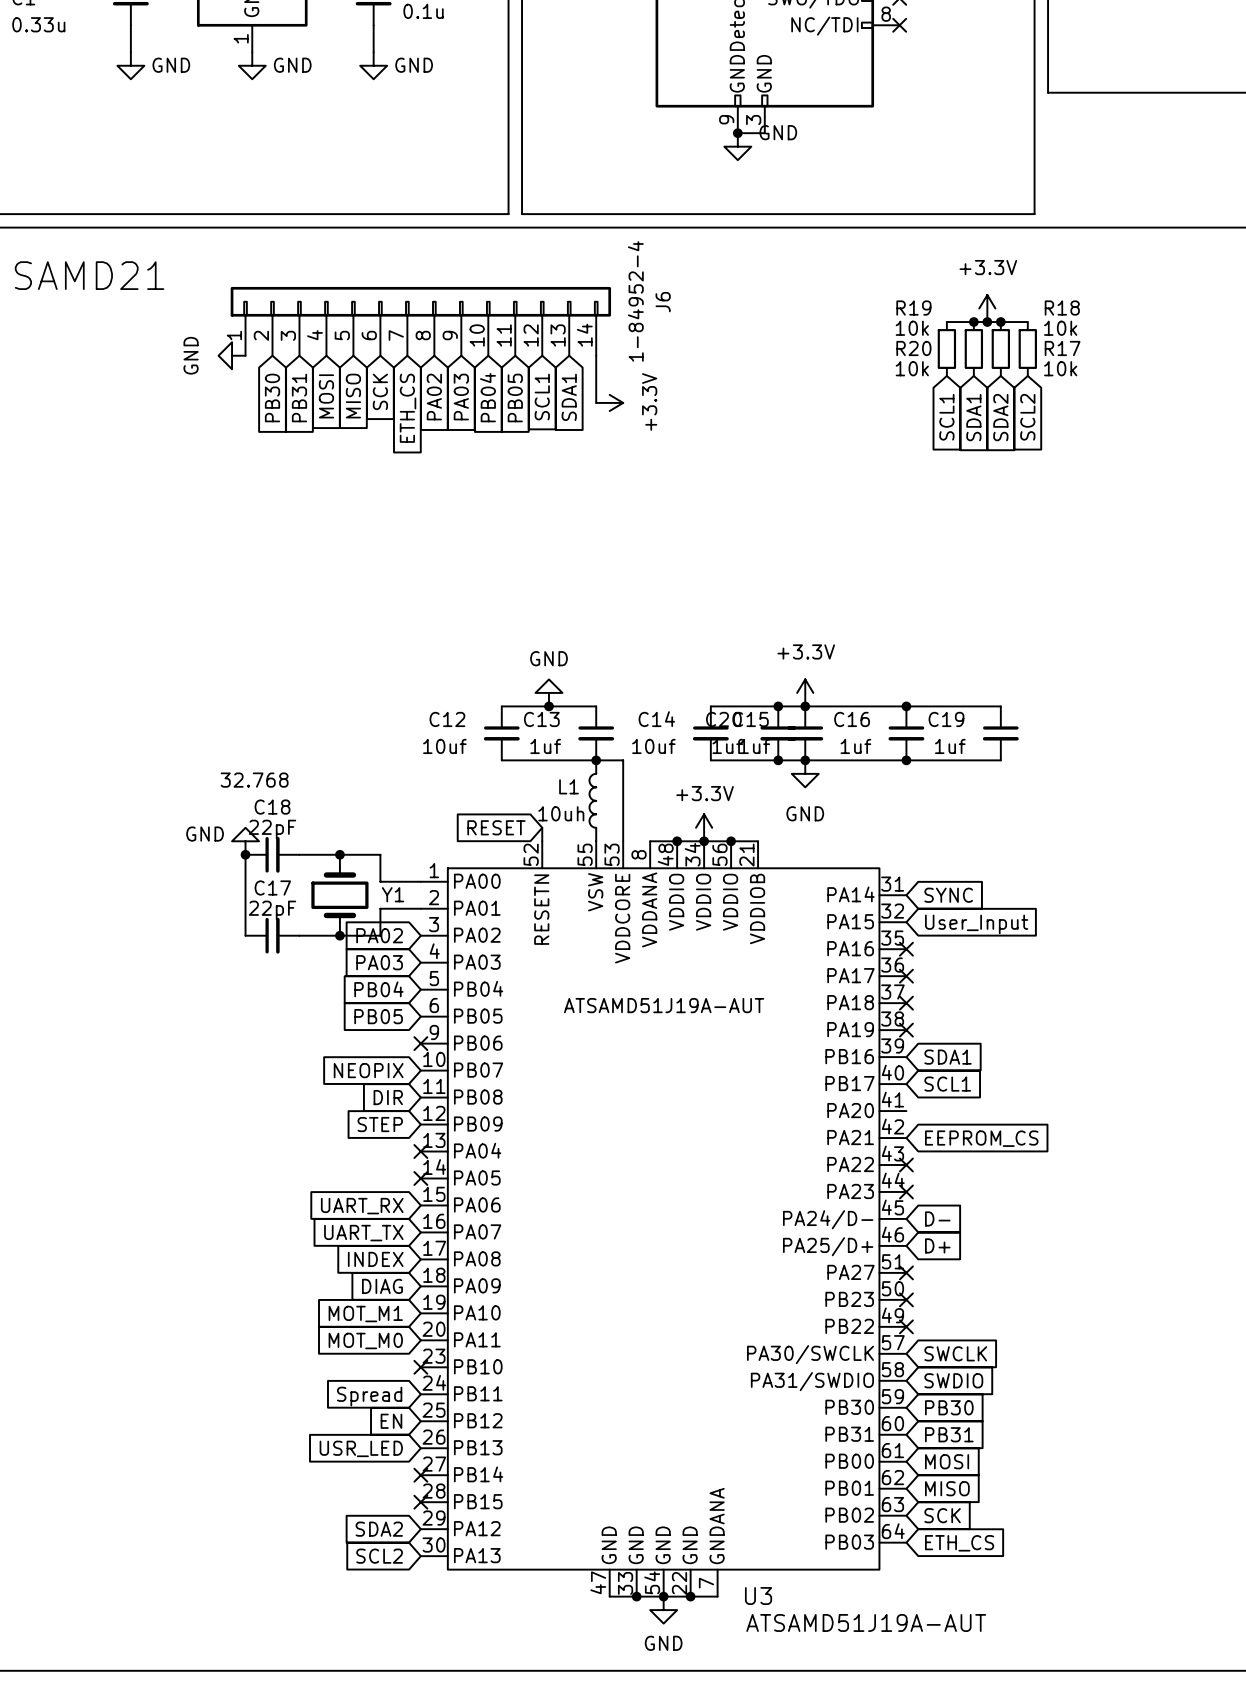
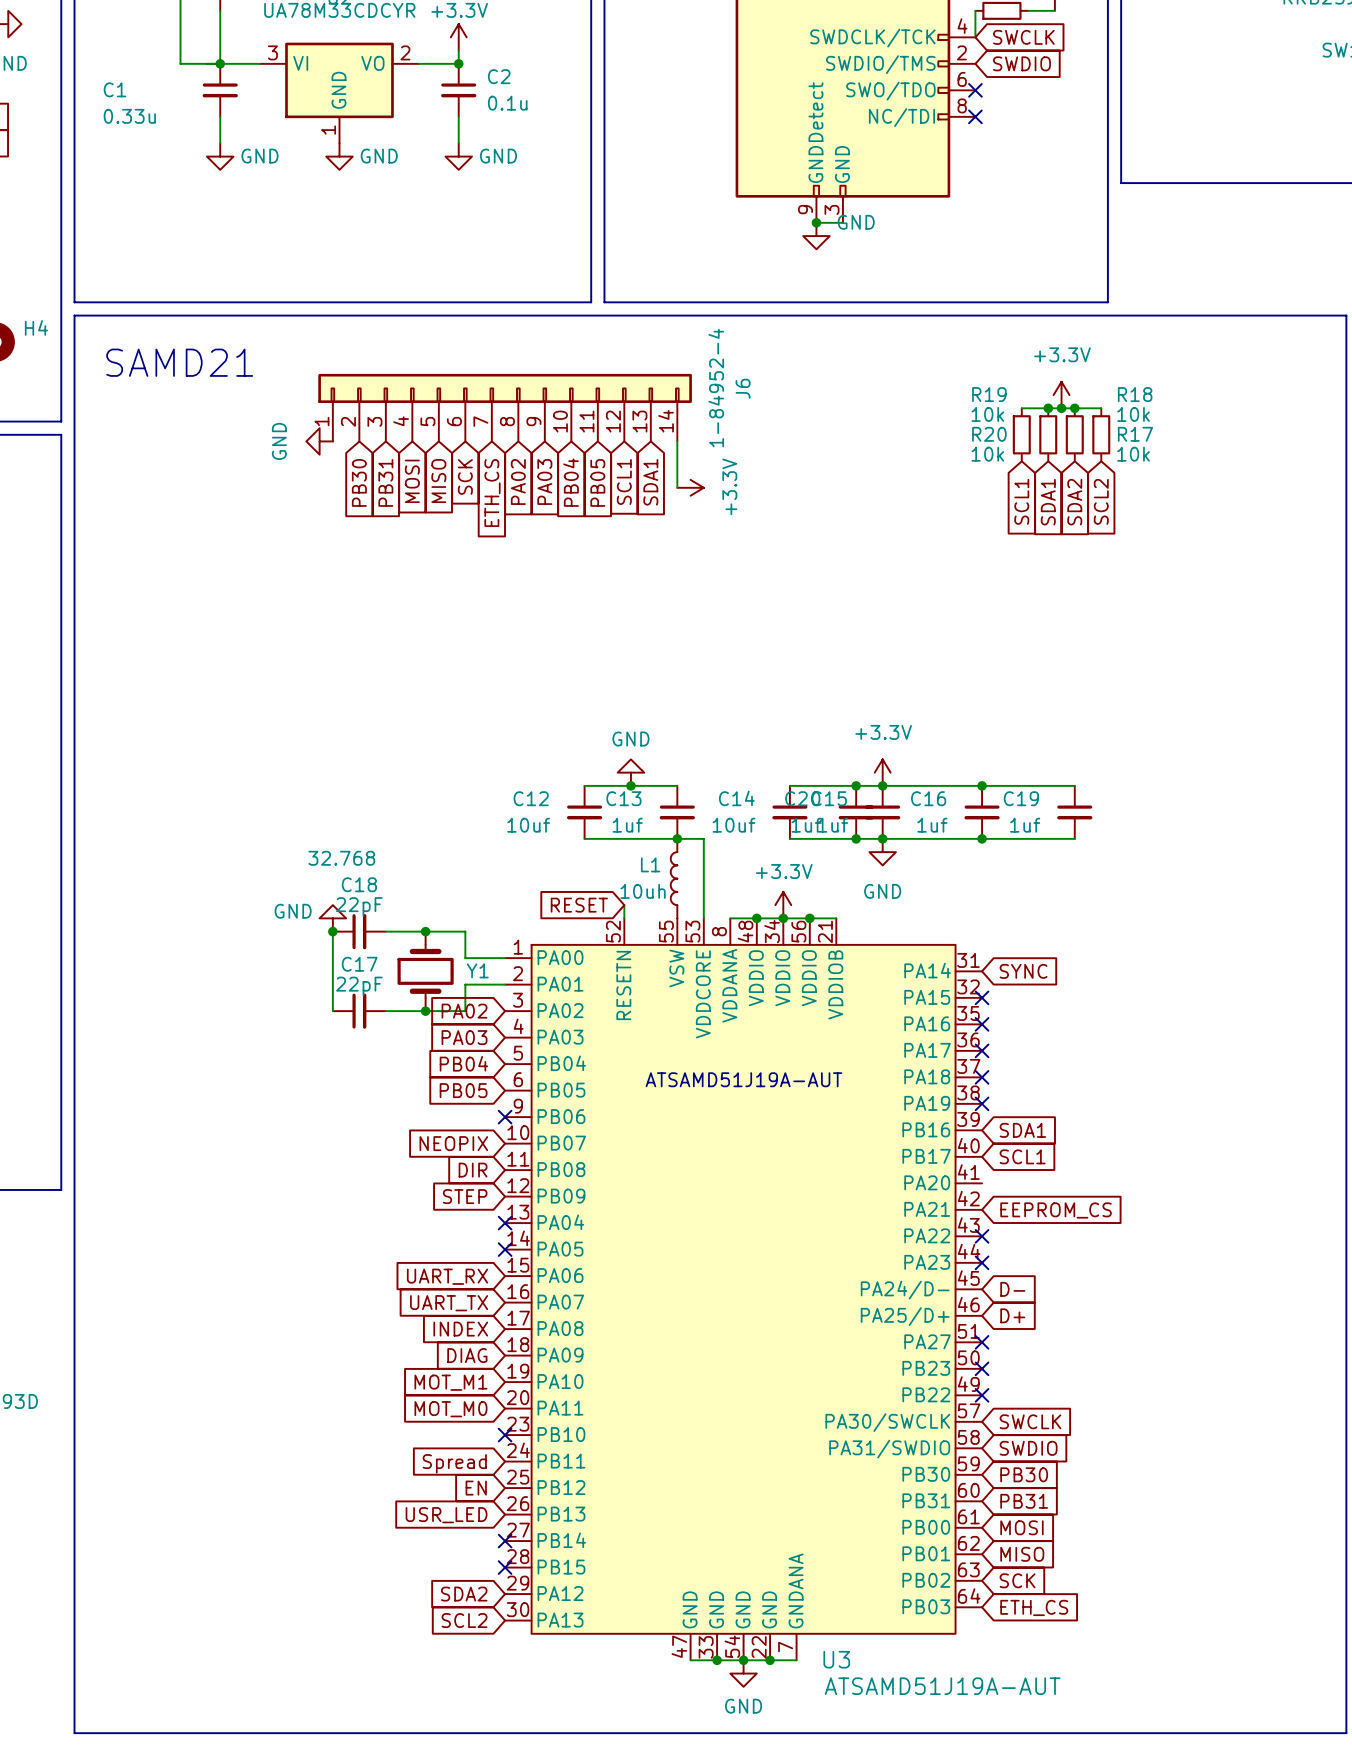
no-connect mark: none -> (982, 997)
global label: User_Input (976, 924) -> none

